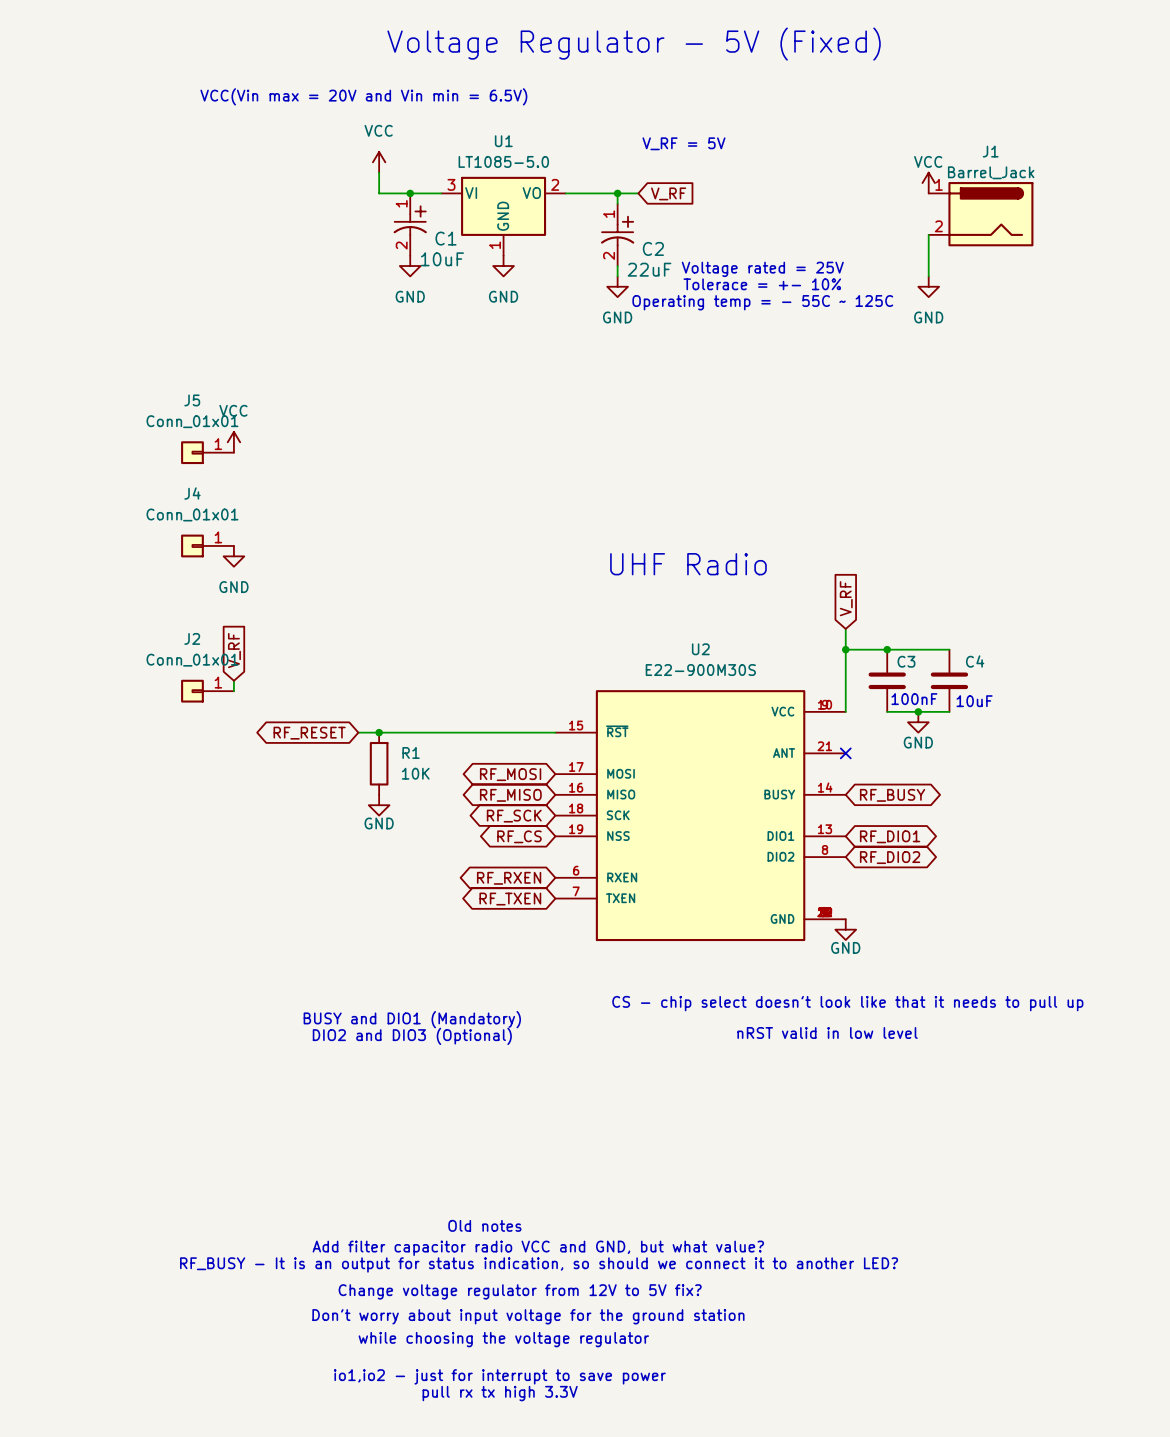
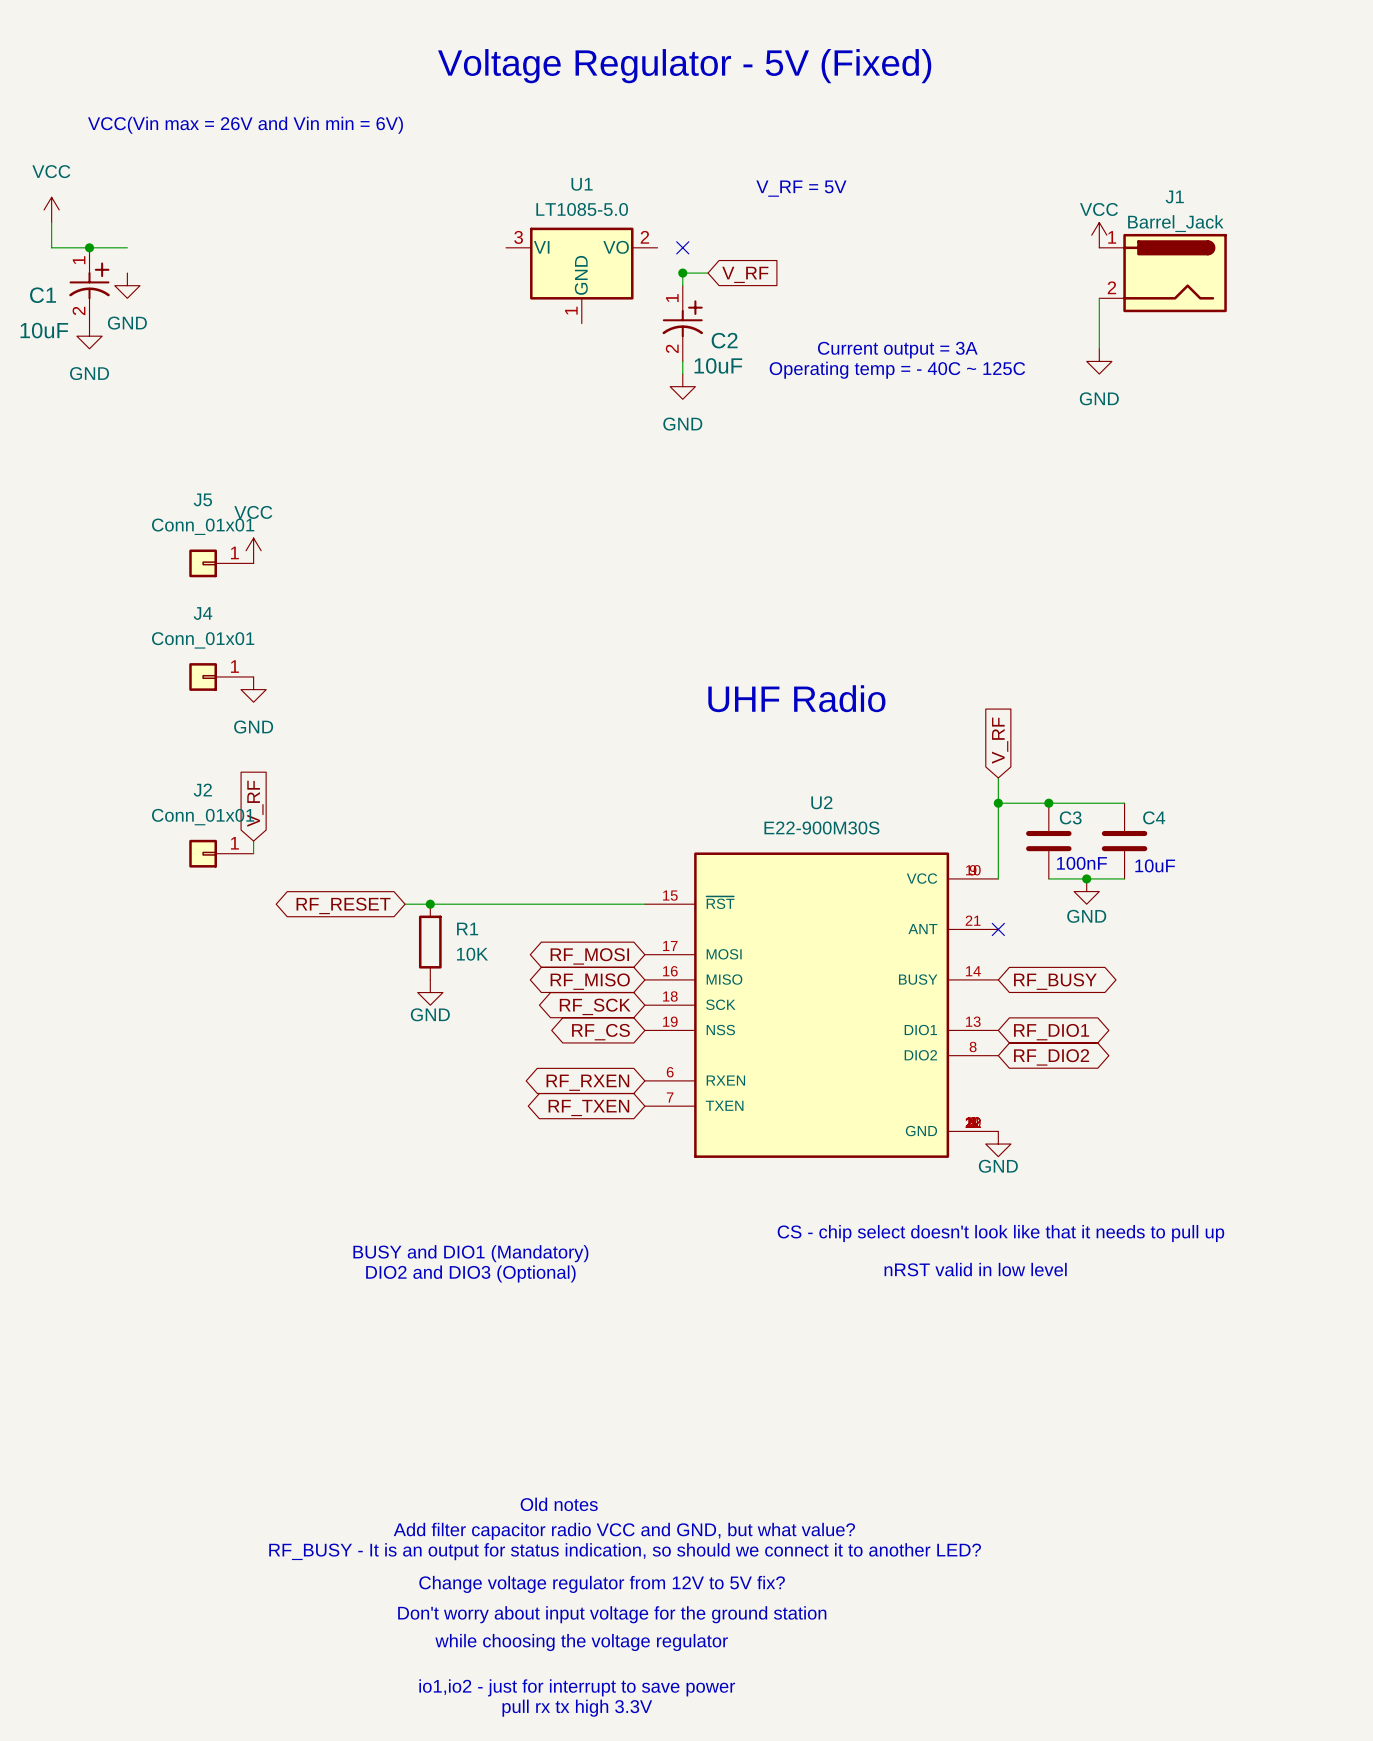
text: VCC(Vin max = 20V and Vin min = 6.5V) (363, 96) -> VCC(Vin max = 26V and Vin min = 6V) (245, 125)
power symbol: none -> VCC (51, 209)
power symbol: VCC (379, 162) -> none
wire: none -> (51, 222) (51, 247) (127, 247)
wire: (379, 172) (379, 193) (441, 193) -> none
junction: none -> (89, 247)
junction: (410, 193) -> none
wire: (565, 193) (638, 193) -> none
no-connect mark: none -> (682, 247)
wire: (617, 193) (617, 203) -> none
junction position: (617, 193) -> (682, 273)
global label position: V_RF (668, 193) -> V_RF (745, 274)
wire: none -> (708, 273) (682, 273) (682, 285)
power symbol: none -> GND (127, 285)
C1 position: (410, 224) -> (89, 285)
C2 position: (617, 234) -> (682, 323)
C1 name position: C1 (446, 238) -> C1 (43, 295)
C1 value position: 10uF (442, 259) -> 10uF (44, 330)
power symbol: none -> GND (89, 336)
power symbol: GND (410, 266) -> none
power symbol: GND (503, 266) -> none
wire: (617, 266) (617, 276) -> (682, 361) (682, 374)
C2 value: 22uF (649, 269) -> 10uF (718, 365)
text: Voltage rated = 25V (762, 269) -> none
text: none -> Current output = 3A (897, 350)
text: Tolerace = +- 10% (762, 284) -> none
power symbol position: GND (617, 286) -> GND (682, 386)
text: Operating temp = - 55C ~ 125C (762, 302) -> Operating temp = - 40C ~ 125C (897, 370)

